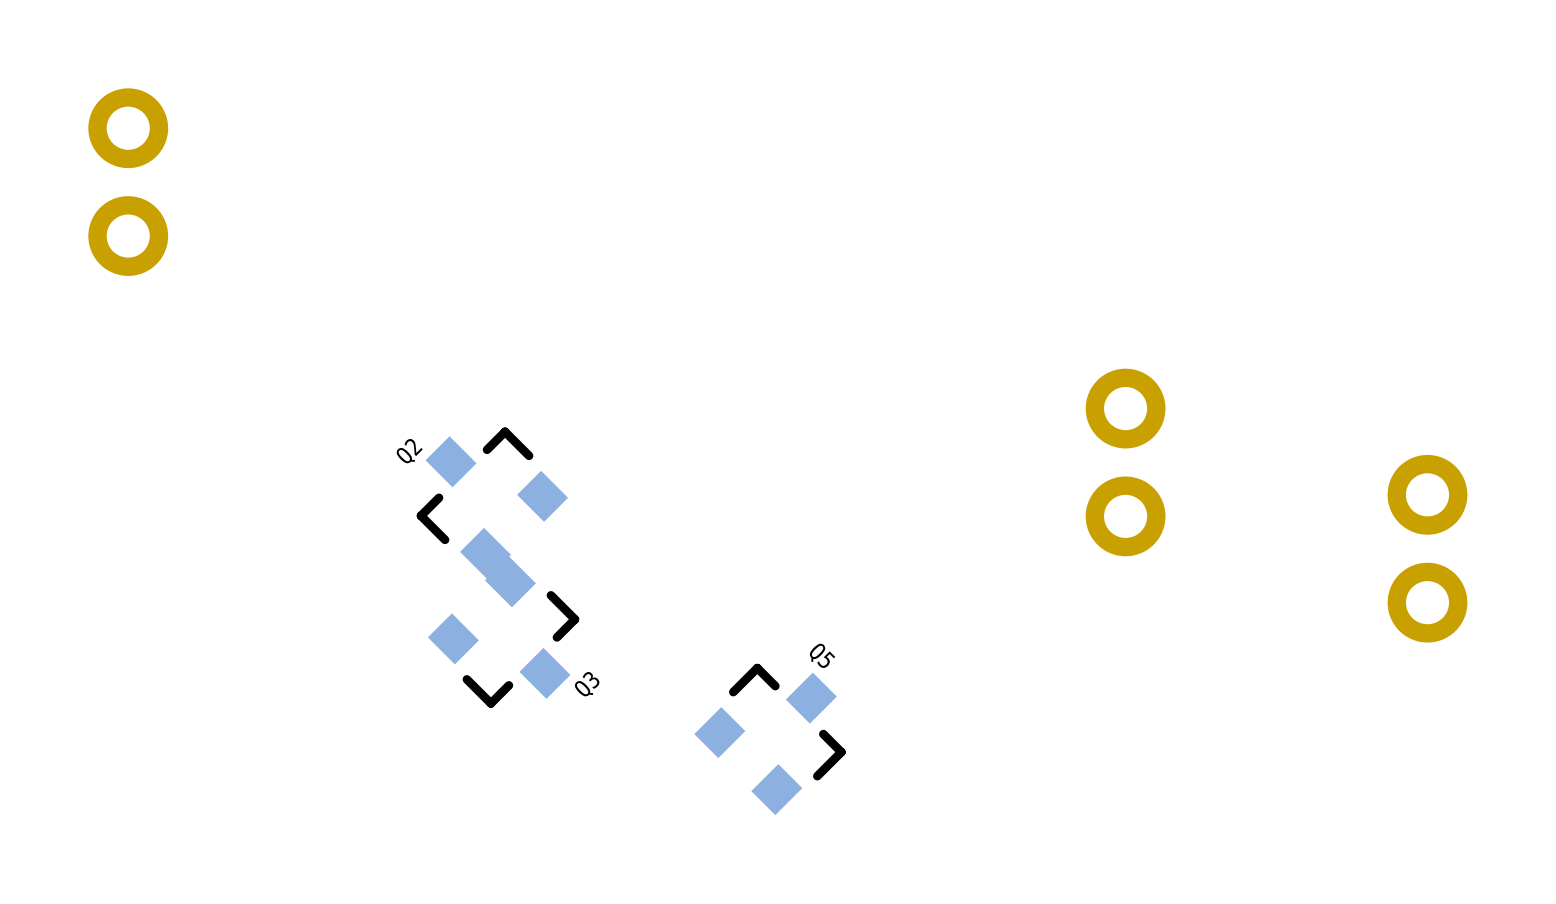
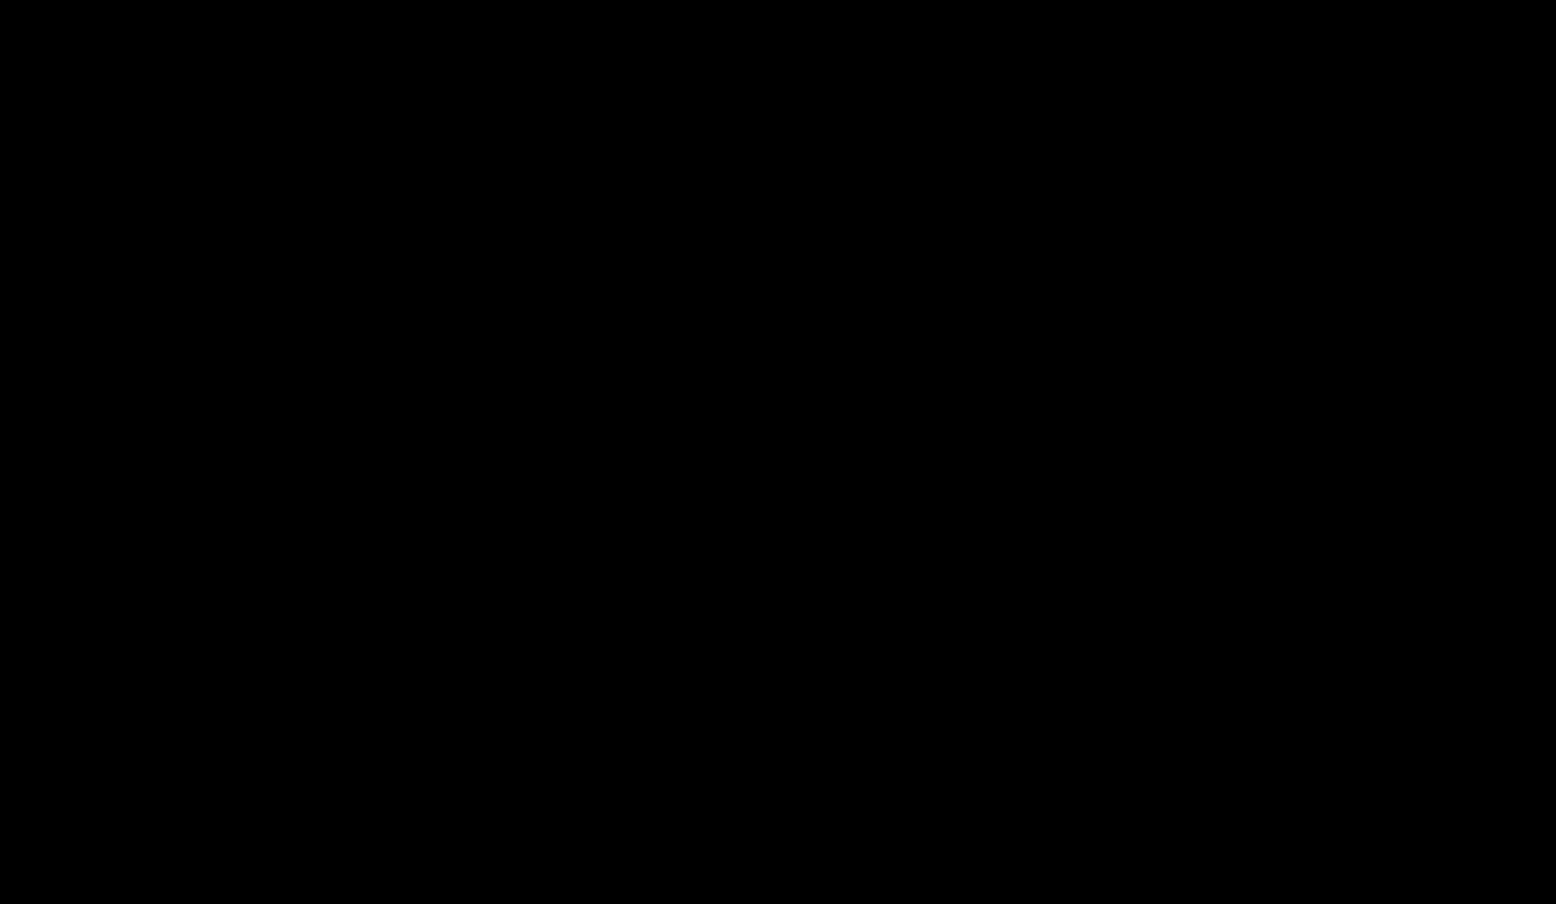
part: (128, 182) -> none
part: (1125, 462) -> none
Q2: (492, 503) -> none
part: (1427, 548) -> none
Q3: (503, 632) -> none
Q5: (769, 739) -> none

